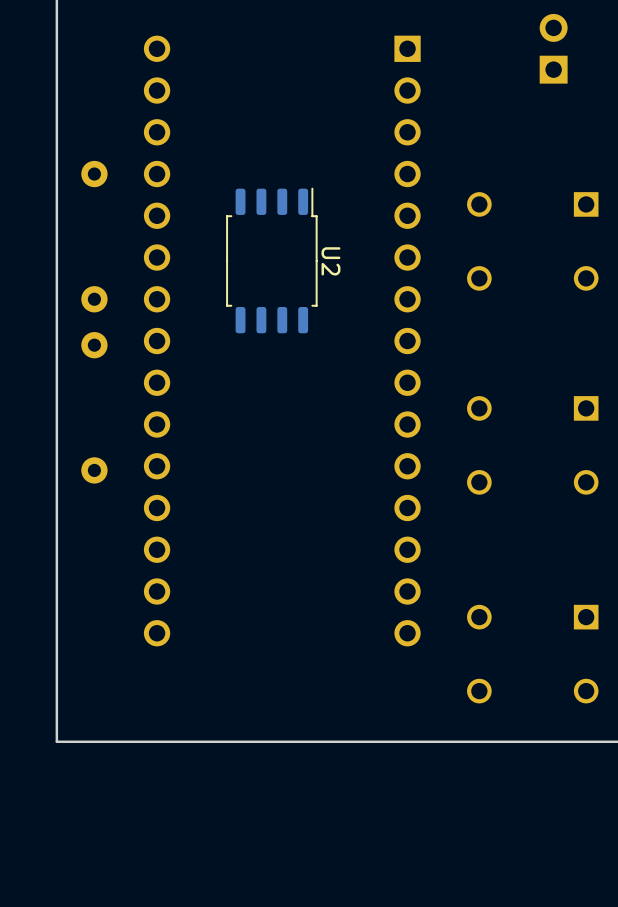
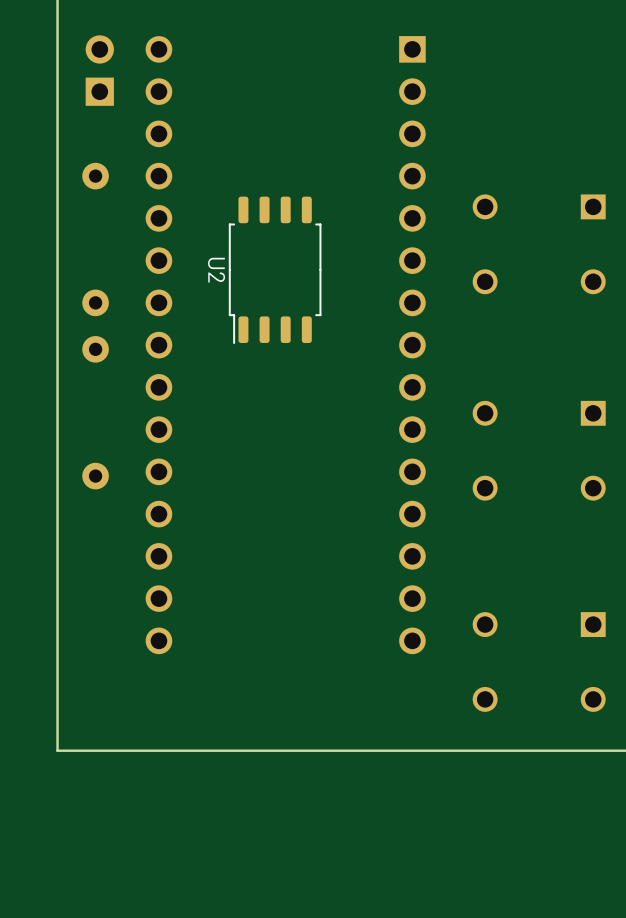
part: (553, 48) -> none
part: none -> (99, 70)
U2 rotation: 0° (271, 260) -> 180° (275, 270)

